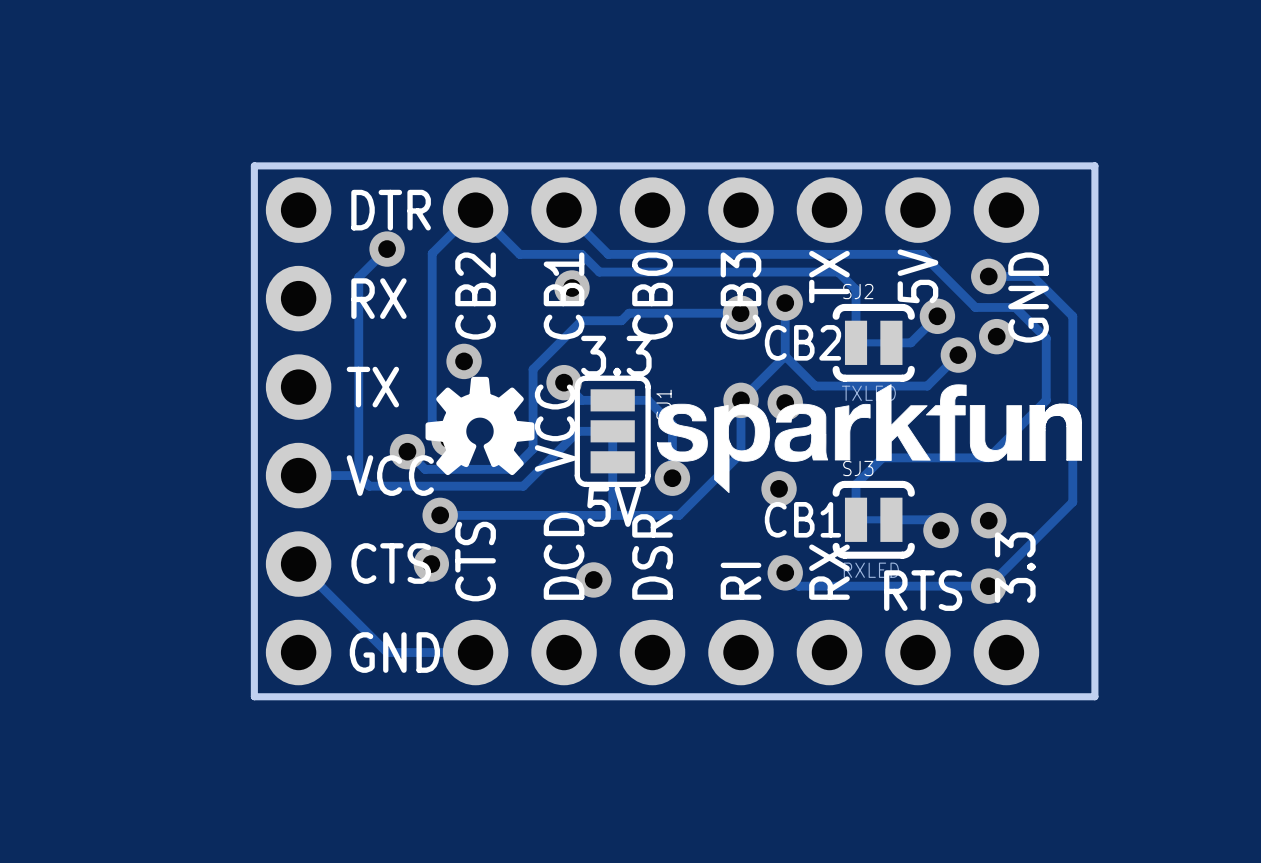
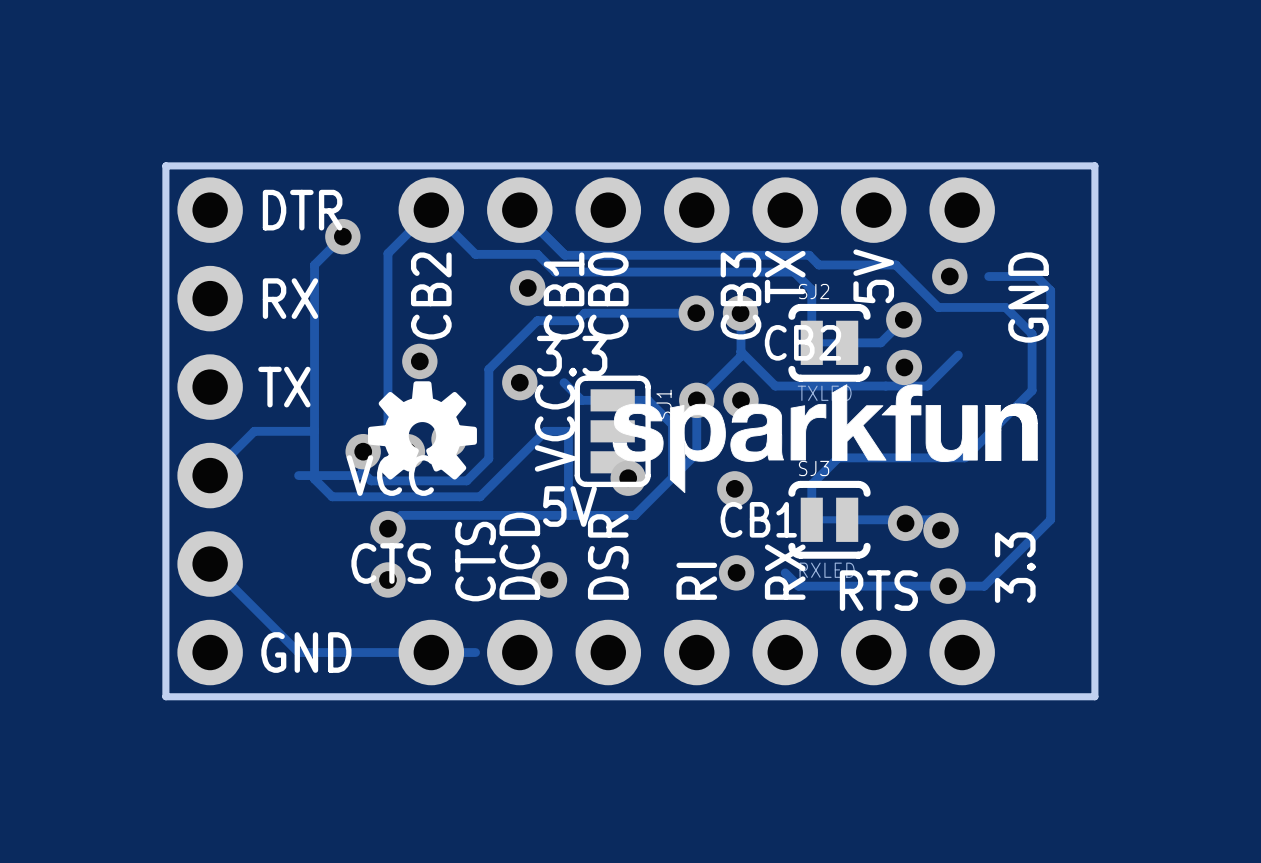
board edge: (254, 165) (254, 696) -> (254, 165) (165, 165) (165, 696) (254, 696)
text position: DTR (391, 210) -> DTR (302, 210)
track: (564, 210) (608, 254) (922, 254) (975, 307) -> (519, 210) (564, 255) (809, 255) (818, 264) (895, 264) (938, 307) (975, 307)
part position: (741, 210) -> (696, 210)
track: none -> (342, 236) (314, 264) (314, 479) (332, 496) (479, 496) (545, 431) (568, 431)
track: (387, 249) (358, 277) (358, 475) (369, 486) (523, 486) (578, 431) (612, 431) -> none
via position: (387, 249) -> (342, 236)
track: (519, 254) (475, 210) (432, 253) (432, 422) (449, 439) -> (519, 254) (475, 254) (431, 210) (387, 253) (387, 430) (410, 450)
track: (537, 254) (581, 254) (599, 272) -> (537, 254) (555, 272) (599, 272)
track: (794, 272) (838, 272) (856, 289) (856, 342) -> (794, 272) (811, 289) (811, 342)
text position: 5V (917, 276) -> 5V (873, 276)
via: none -> (949, 276)
via: (988, 276) -> none
track: (1032, 276) (1072, 316) (1072, 502) (988, 586) (984, 586) -> (1032, 276) (1036, 276) (1050, 290) (1050, 519) (984, 586)
text position: TX (829, 277) -> TX (785, 277)
via position: (572, 287) -> (527, 287)
text position: CB2 (475, 296) -> CB2 (431, 296)
text position: CB0 (652, 296) -> CB0 (608, 296)
text position: RX (378, 298) -> RX (290, 298)
track: (785, 303) (785, 356) -> none
via: (785, 303) -> none
track: (1005, 307) (1015, 307) (1046, 338) (1046, 400) (988, 457) (964, 457) -> (1005, 307) (1032, 334) (1032, 390) (964, 457)
track: (629, 313) (621, 320) (581, 320) (533, 369) (533, 449) (512, 469) (425, 469) (407, 451) -> (629, 313) (584, 313) (577, 320) (537, 320) (488, 369) (488, 458) (466, 480) (371, 480) (362, 472) (363, 451)
via: none -> (696, 313)
track: (740, 313) (696, 313) -> (891, 519) (847, 519)
track: (937, 316) (910, 342) (891, 342) -> none
via position: (937, 316) -> (903, 319)
track: none -> (903, 319) (880, 342) (847, 342)
via: (996, 336) -> none
SJ2 position: (873, 342) -> (829, 342)
via: (958, 355) -> none
text position: 3.3 (616, 356) -> 3.3 (572, 356)
track: (785, 356) (815, 386) -> (741, 351) (775, 386) (815, 386)
track: (785, 356) (741, 400) (741, 453) (679, 515) (634, 515) -> (741, 303) (741, 356) (696, 400) (696, 453) (634, 515)
via: none -> (419, 361)
via: (464, 361) -> none
via: none -> (904, 367)
via: none -> (519, 382)
via: (564, 382) -> none
text position: TX (372, 387) -> TX (284, 387)
via: none -> (696, 400)
via: (785, 403) -> none
drawing position: (479, 425) -> (422, 430)
part position: (298, 431) -> (210, 431)
track: none -> (314, 431) (254, 431) (210, 475)
track: (612, 435) (612, 515) -> (568, 435) (568, 515)
drawing position: (869, 438) -> (825, 438)
via: none -> (363, 451)
track: (882, 457) (856, 484) (856, 519) -> (882, 457) (838, 457) (811, 484) (811, 519)
via: none -> (628, 478)
via: (672, 478) -> none
via: none -> (734, 488)
via: (779, 488) -> none
text position: 5V (614, 506) -> 5V (569, 506)
track: none -> (440, 515) (401, 515) (387, 528)
via: (440, 515) -> none
text position: CB1 (802, 519) -> CB1 (758, 519)
SJ3 position: (873, 519) -> (829, 519)
via: (988, 520) -> none
via: none -> (905, 523)
via: none -> (387, 528)
text position: DCD (564, 556) -> DCD (519, 556)
text position: DSR (652, 557) -> DSR (608, 557)
track: (298, 564) (387, 652) -> (210, 564) (298, 652) (387, 652)
via: (431, 564) -> none
via: none -> (736, 572)
via: (785, 572) -> none
text position: RX (829, 572) -> RX (785, 572)
via: none -> (387, 579)
via position: (593, 579) -> (549, 579)
text position: RI (741, 581) -> RI (696, 581)
via: none -> (948, 586)
via: (988, 586) -> none
text position: RTS (923, 590) -> RTS (878, 590)
text position: GND (394, 652) -> GND (306, 652)
part position: (741, 652) -> (696, 652)

